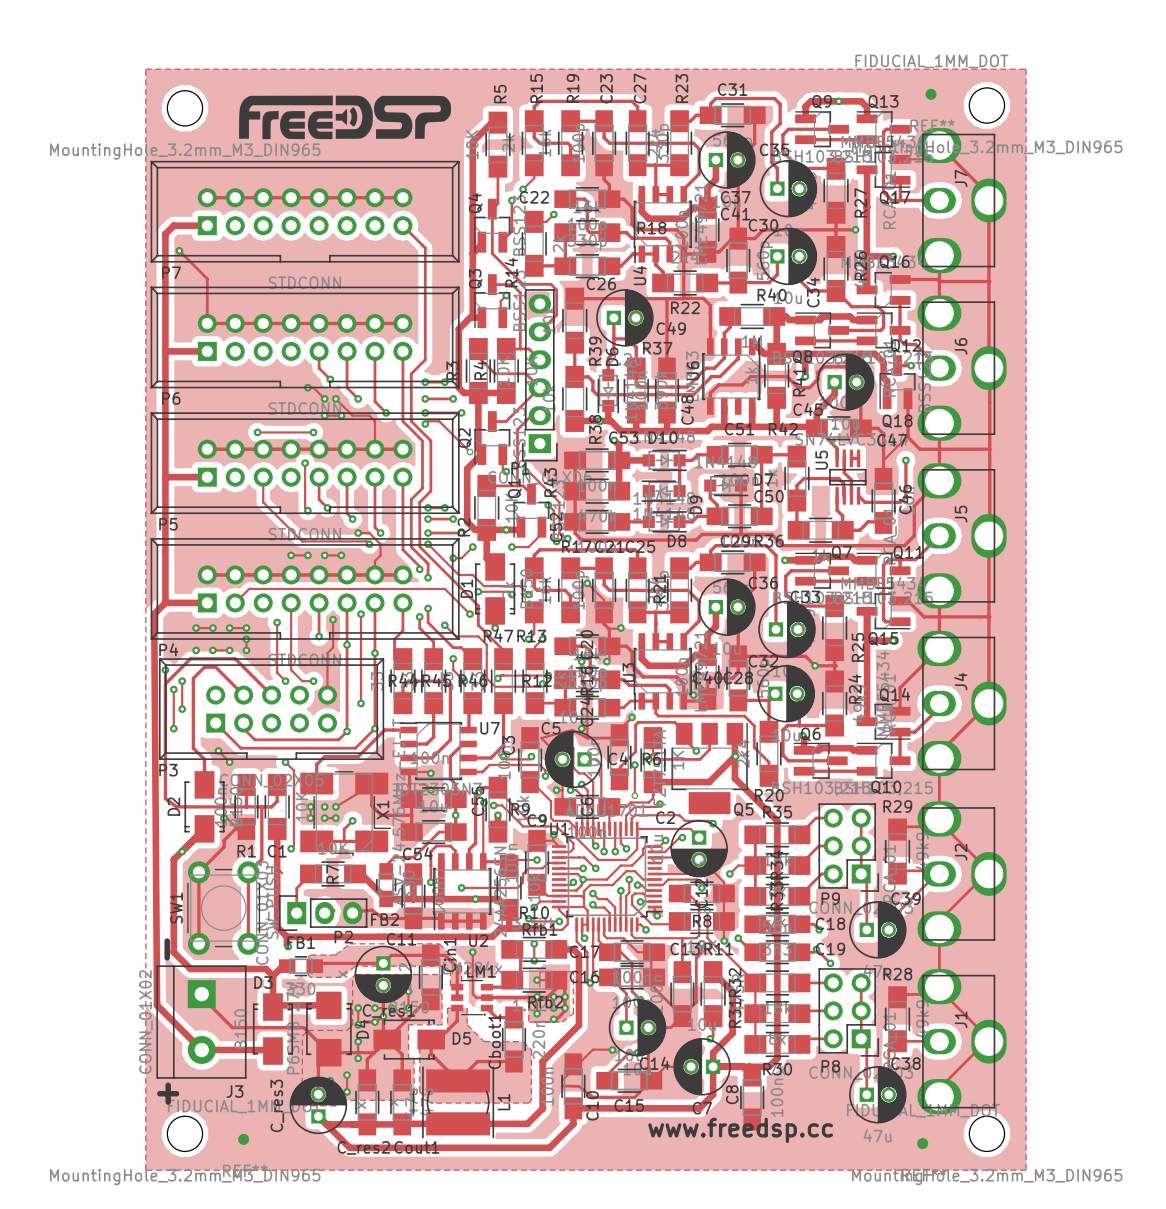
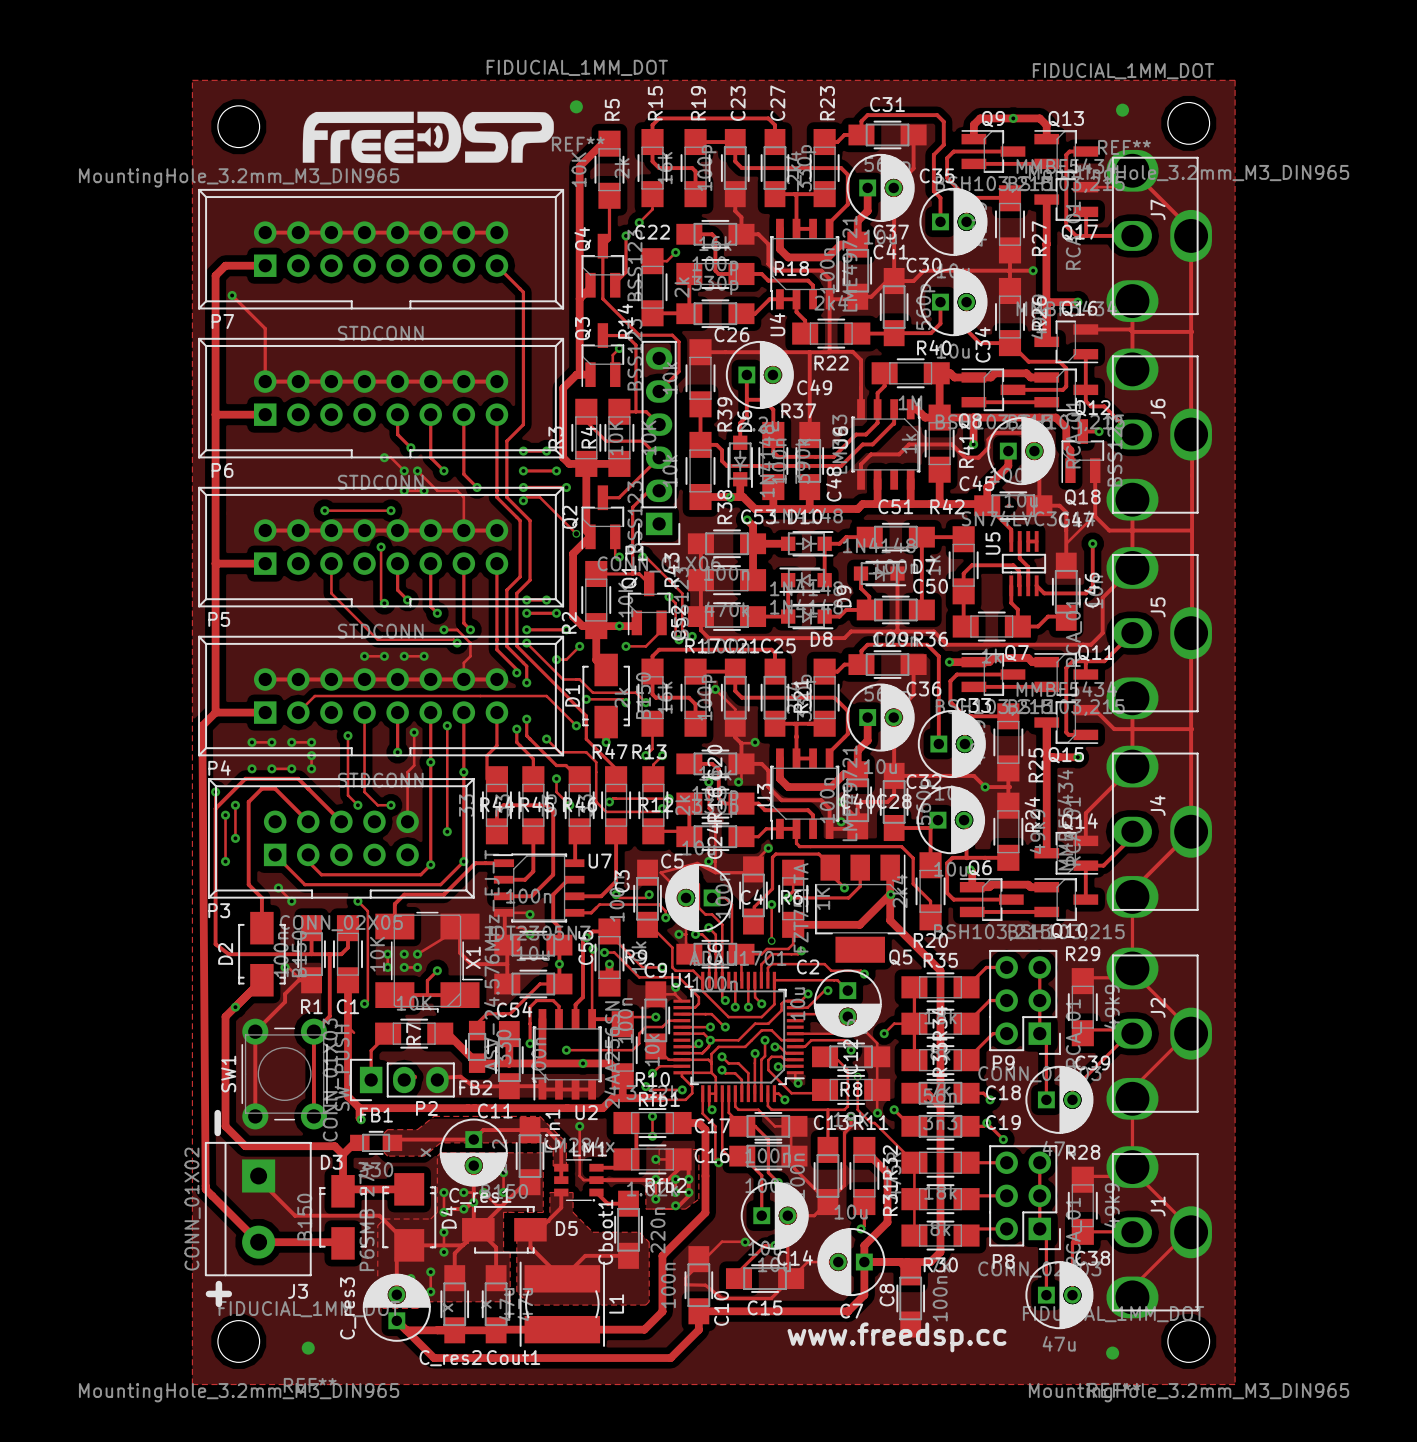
REF**: none -> FIDUCIAL_1MM_DOT (576, 106)

